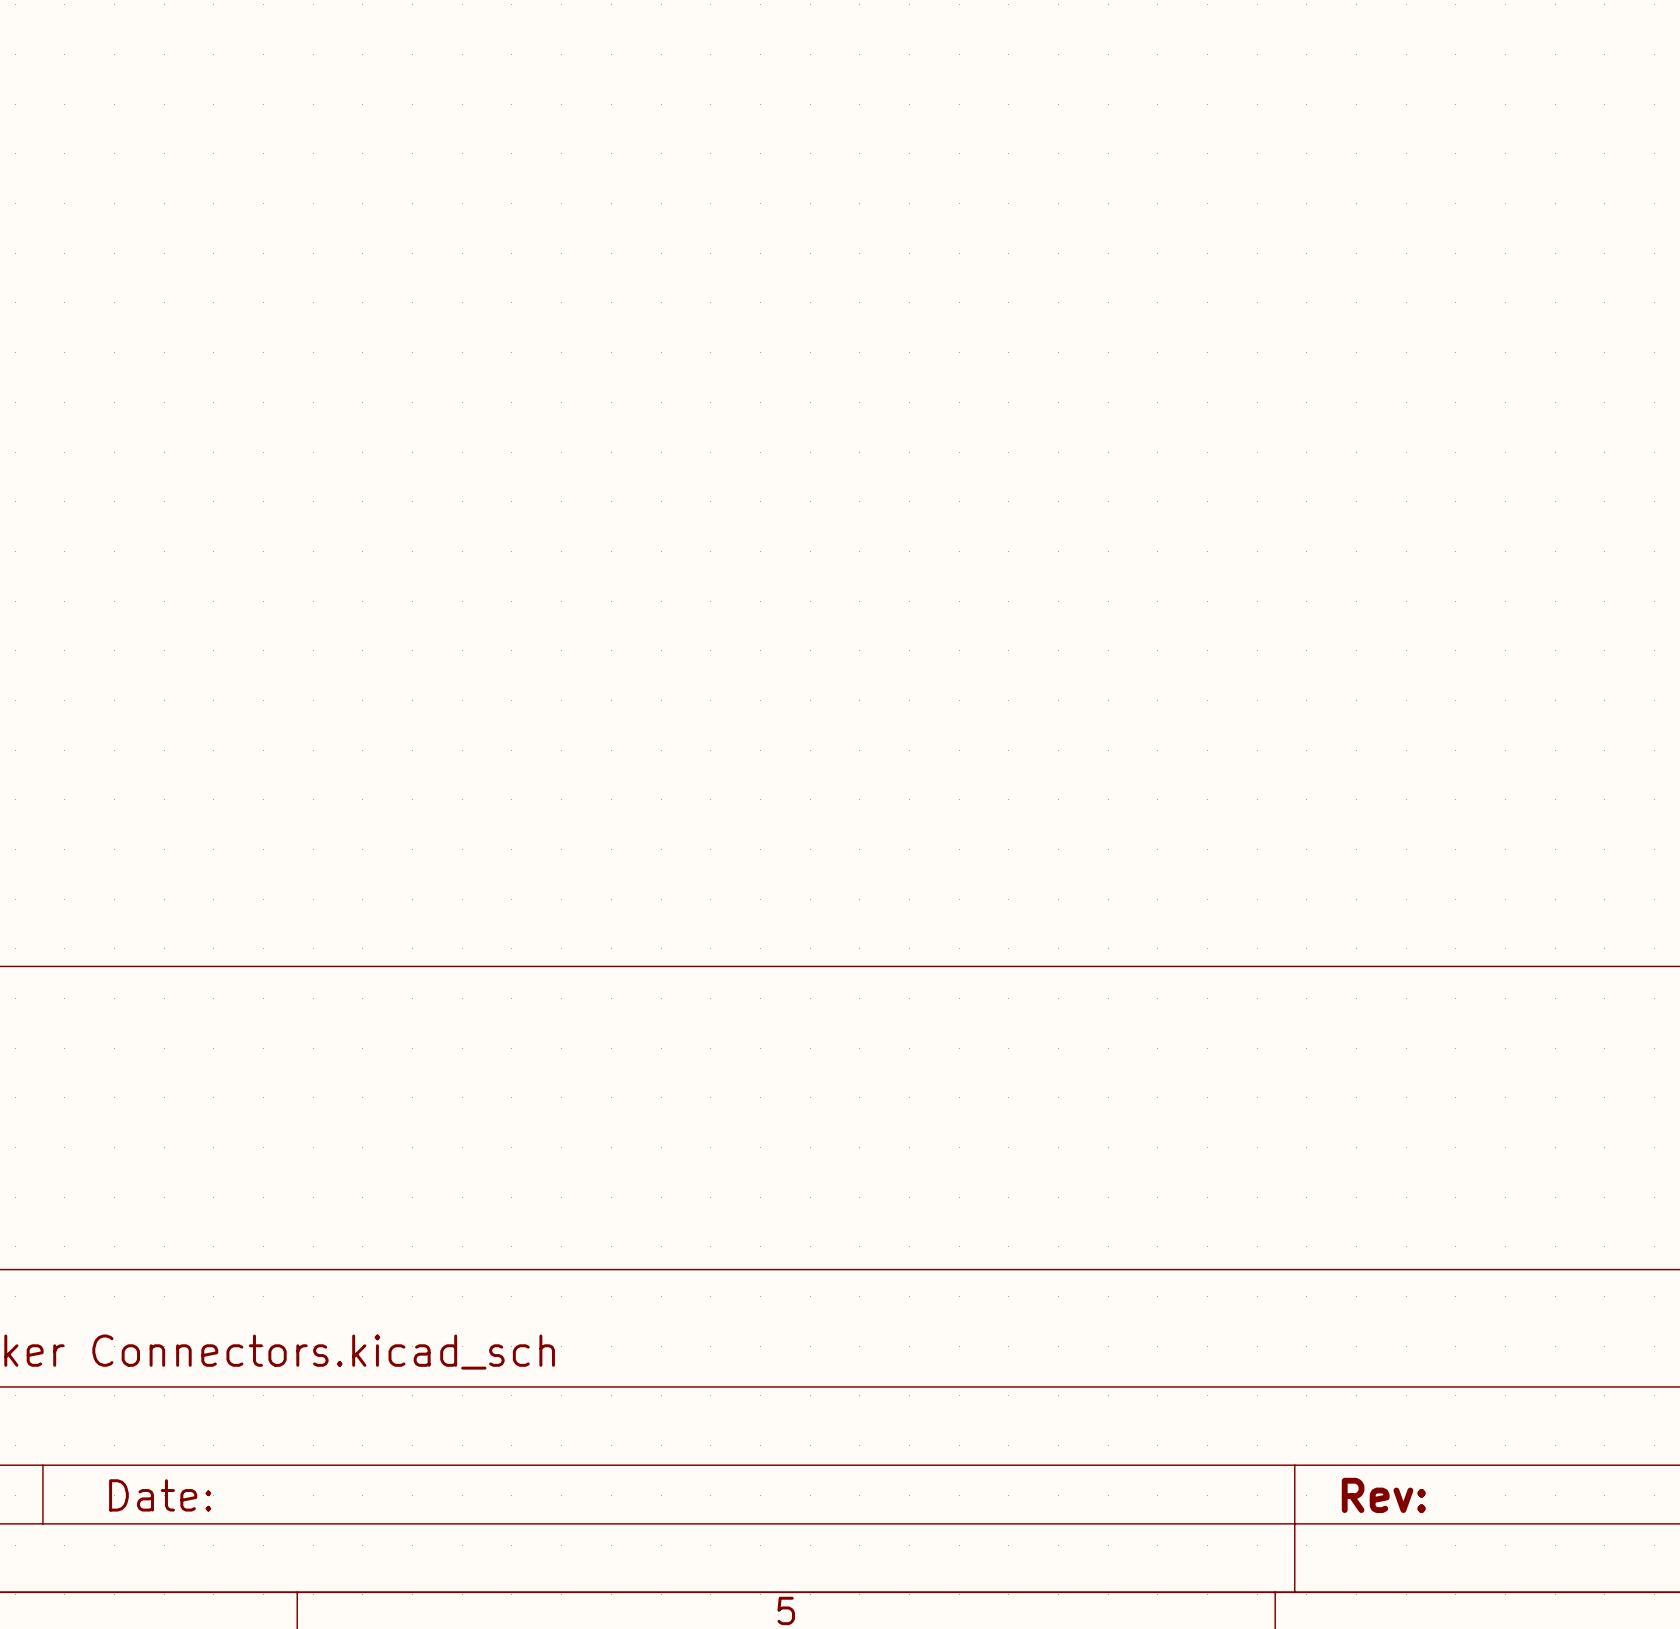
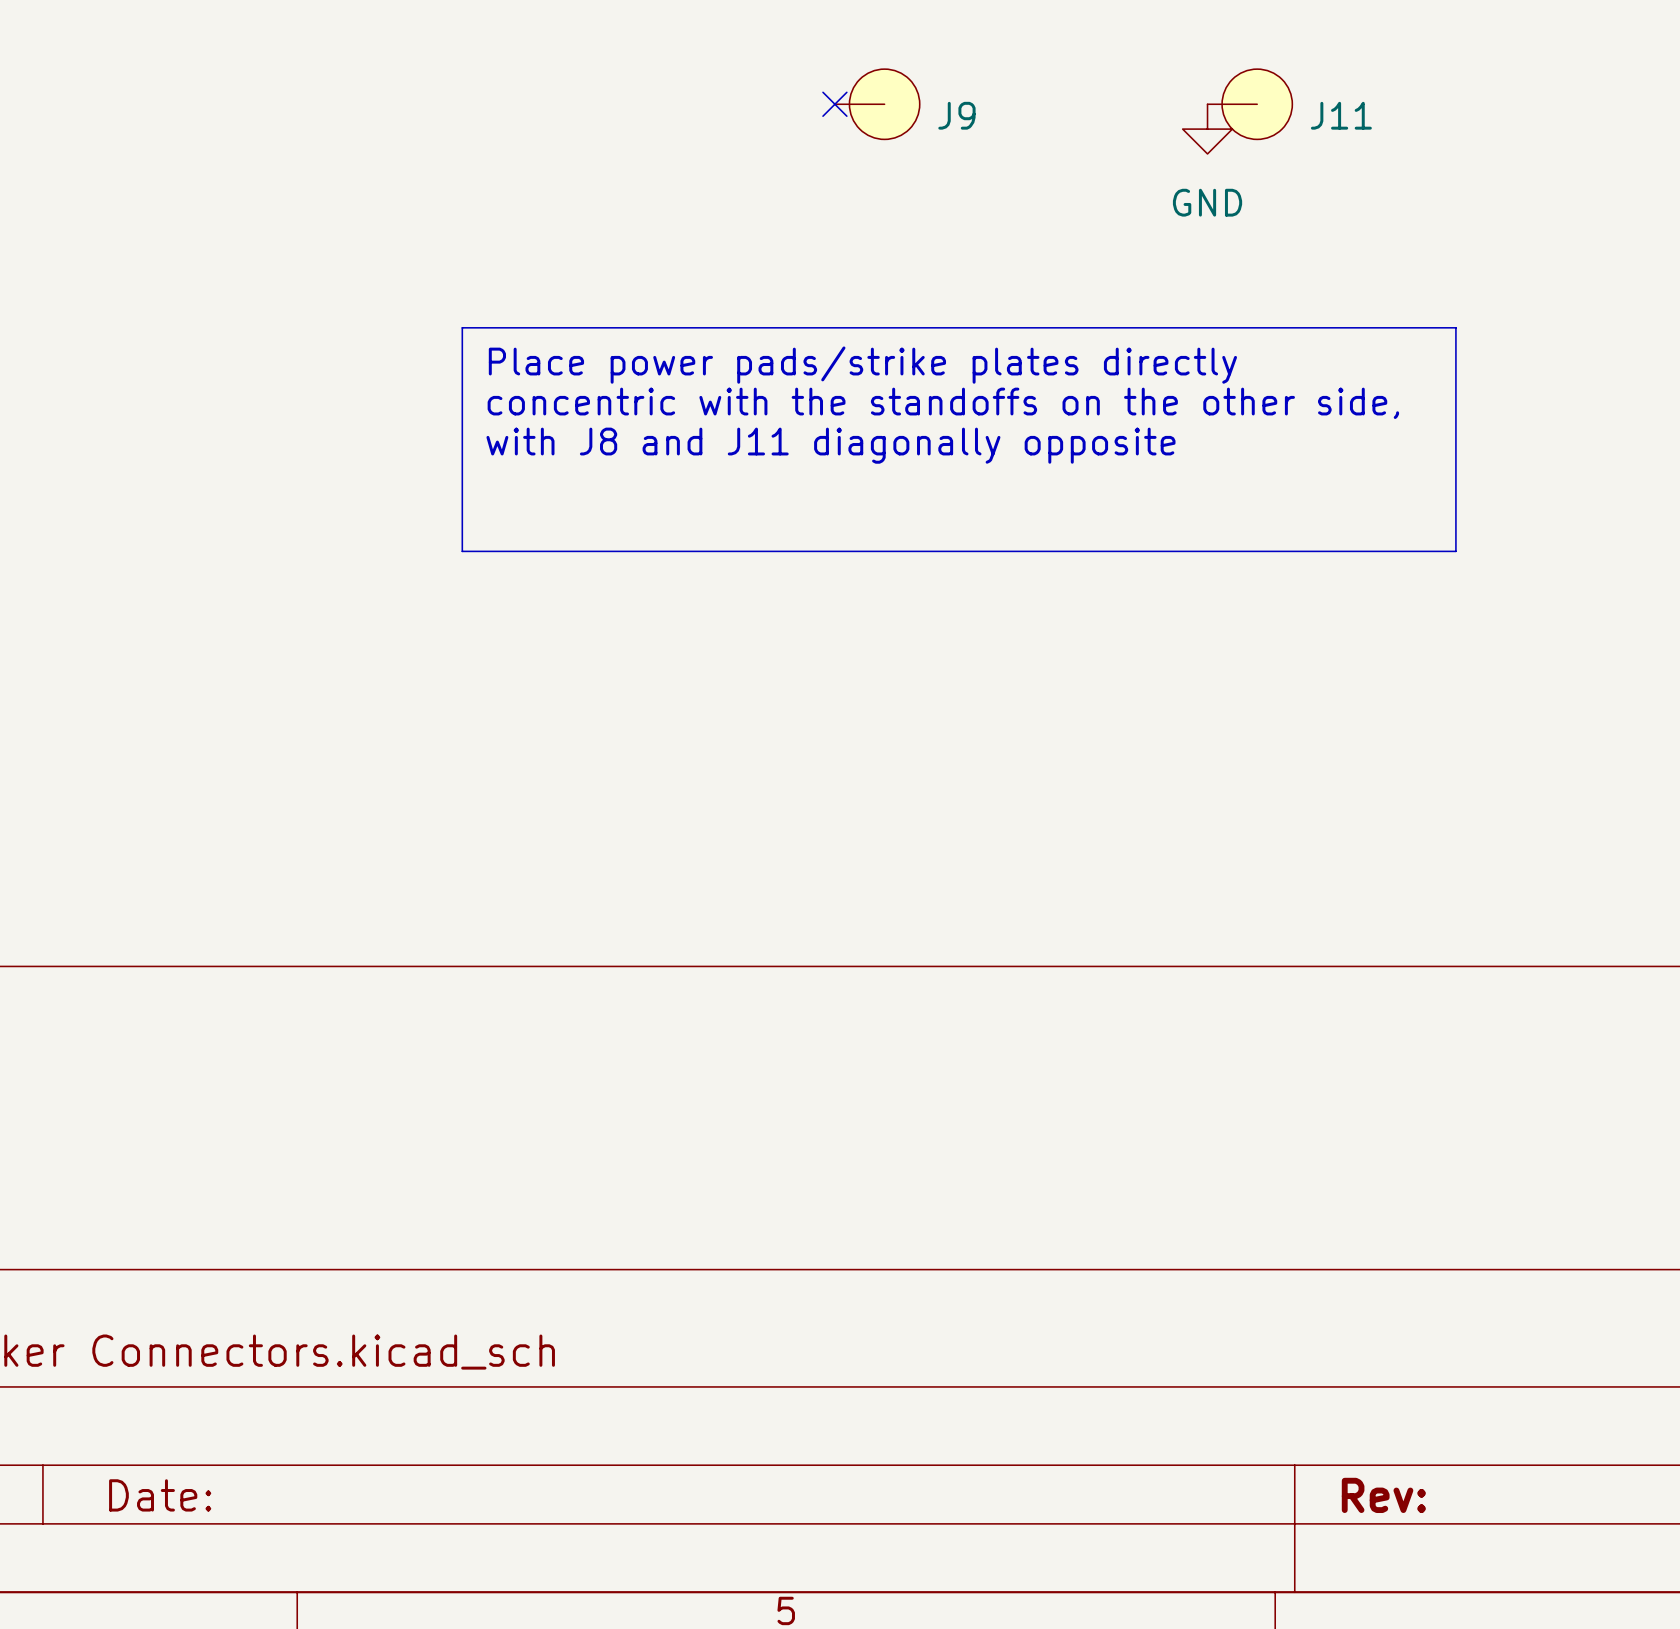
no-connect mark: none -> (834, 104)
J9: none -> (877, 104)
J11: none -> (1249, 104)
power symbol: none -> GND (1207, 129)
line: none -> (462, 327) (1455, 327) (1455, 551) (462, 551) (462, 327)
text: none -> Place power pads/strike plates directly (862, 365)
text: none -> concentric with the standoffs on the other side, (943, 403)
text: none -> with J8 and J11 diagonally opposite (830, 445)

